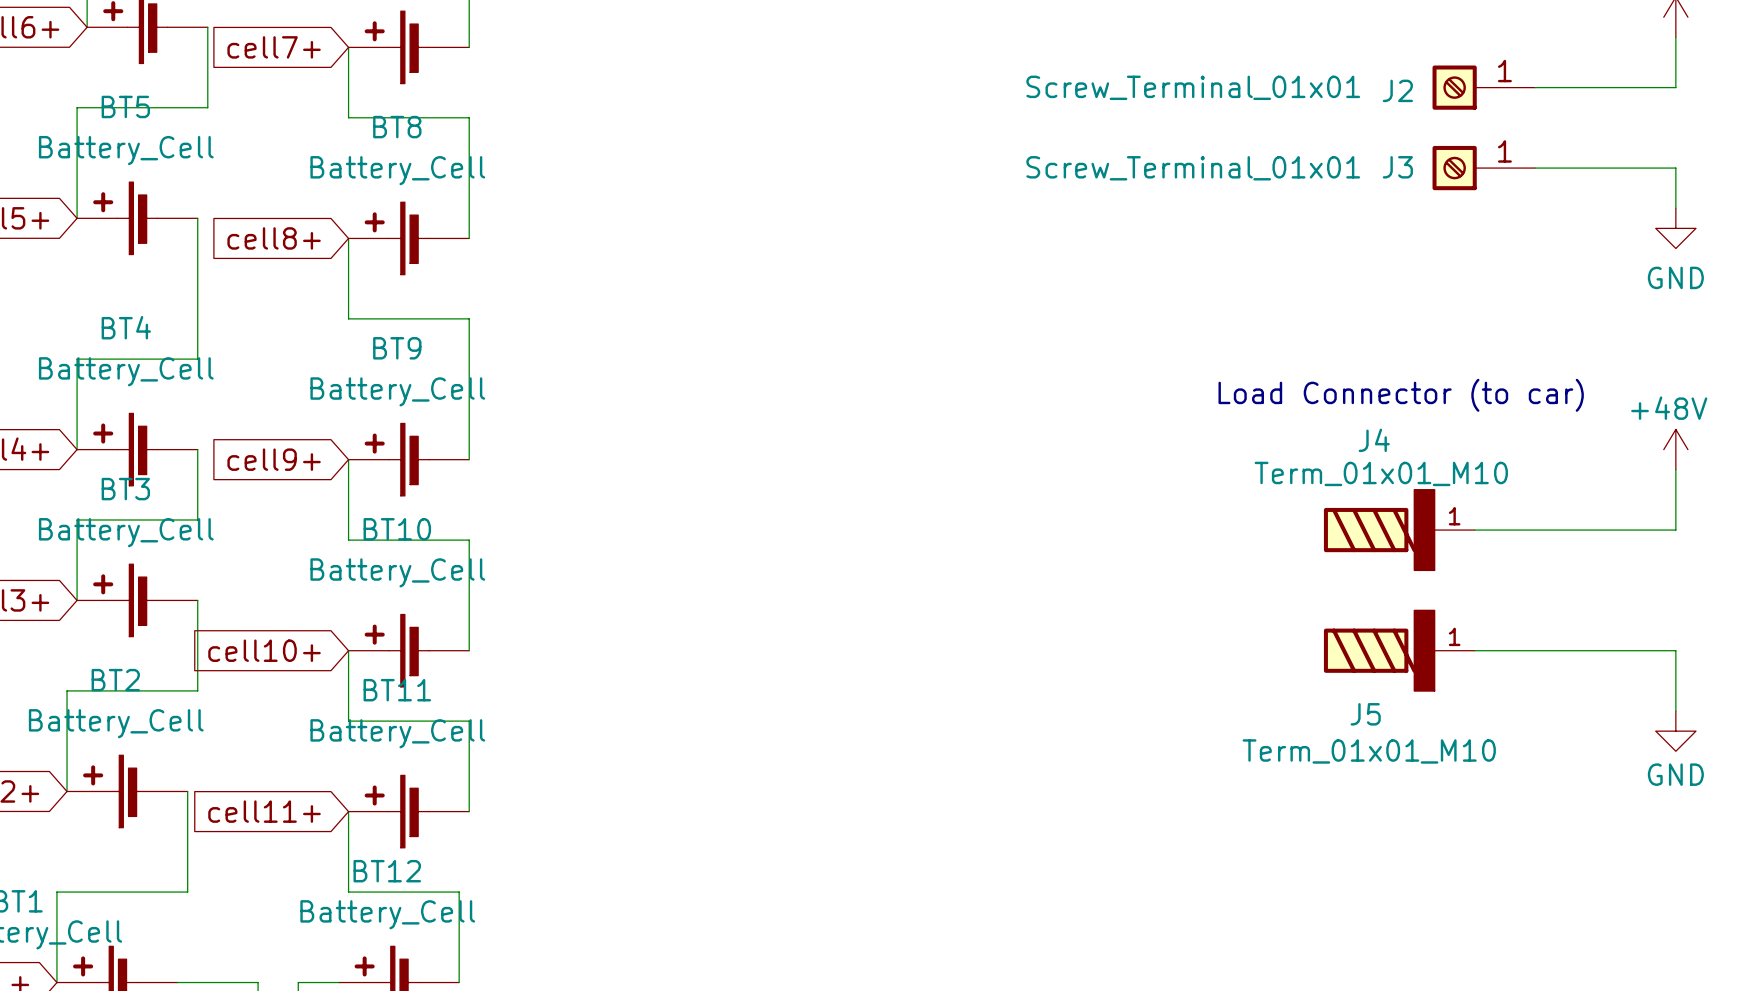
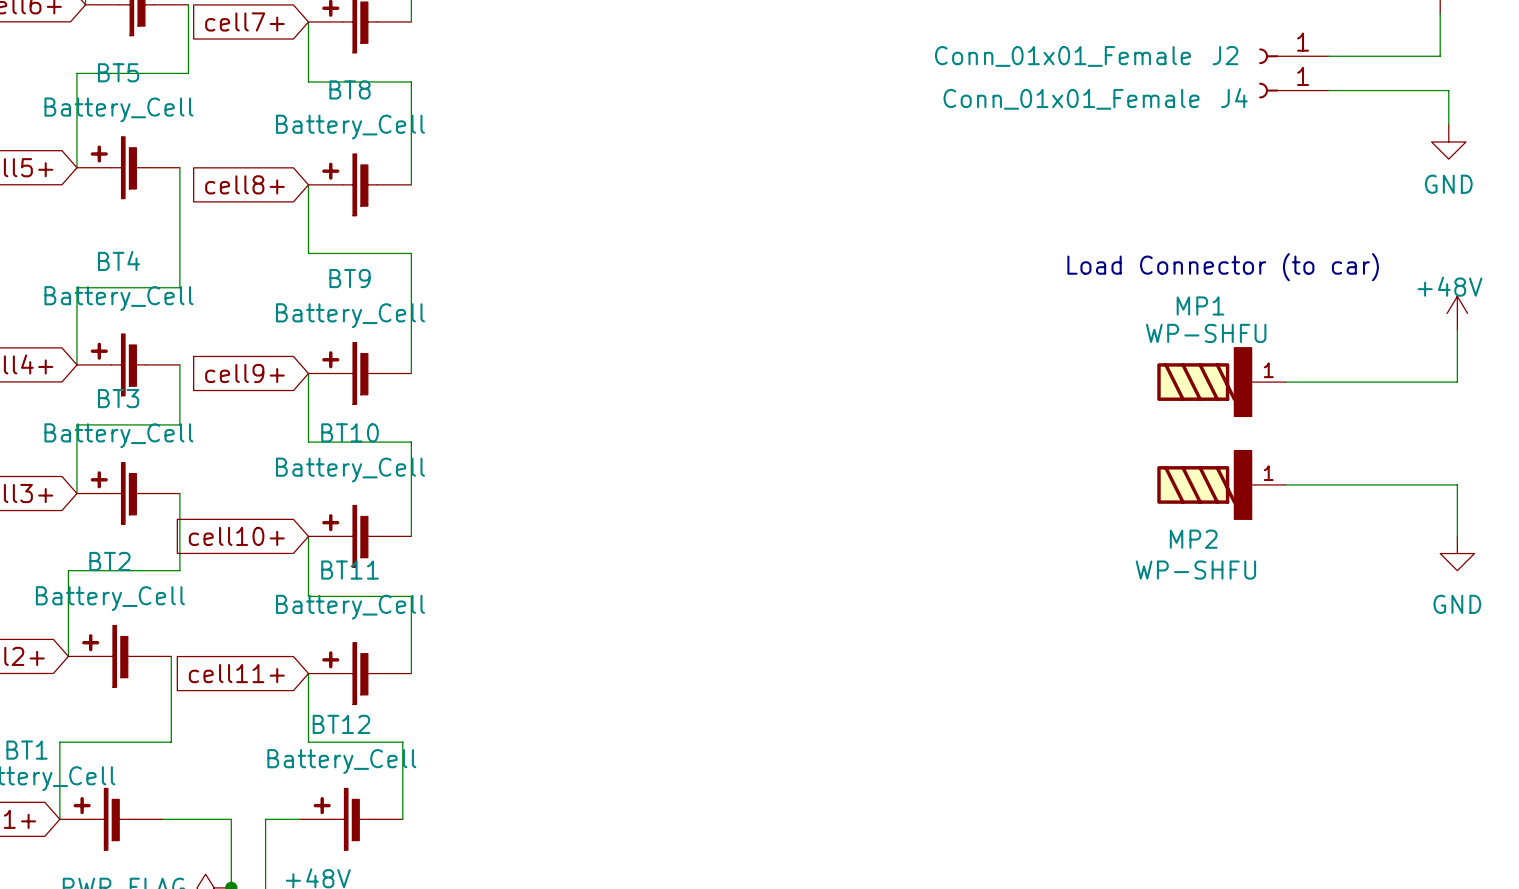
J2 symbol: [1432, 65, 1536, 110] -> [1259, 48, 1329, 65]
J2 value: Screw_Terminal_01x01 (1193, 87) -> Conn_01x01_Female (1062, 56)
J3: Screw_Terminal_01x01 (1483, 168) -> none
wire: (1535, 168) (1675, 168) (1675, 208) -> (1328, 90) (1448, 90) (1448, 124)
power symbol position: GND (1675, 228) -> GND (1448, 142)
text position: Load Connector (to car) (1401, 395) -> Load Connector (to car) (1223, 267)
power symbol text position: +48V (1669, 408) -> +48V (1450, 286)
J4 name position: J4 (1374, 440) -> J4 (1234, 98)
power symbol position: +48V (1675, 449) -> +48V (1457, 313)
MP1: none -> WP-SHFU (1221, 382)
wire: (1675, 469) (1675, 530) (1474, 530) -> (1457, 330) (1457, 382) (1285, 382)
J4 value: Term_01x01_M10 (1381, 473) -> Conn_01x01_Female (1071, 99)
J4 symbol: [1323, 489, 1475, 572] -> [1259, 82, 1329, 99]
MP2: none -> WP-SHFU (1221, 484)
J5: Term_01x01_M10 (1399, 650) -> none
wire: (1474, 650) (1675, 650) (1675, 711) -> (1285, 484) (1457, 484) (1457, 536)
power symbol position: GND (1675, 731) -> GND (1457, 553)
power symbol text position: GND (1675, 774) -> GND (1457, 604)

